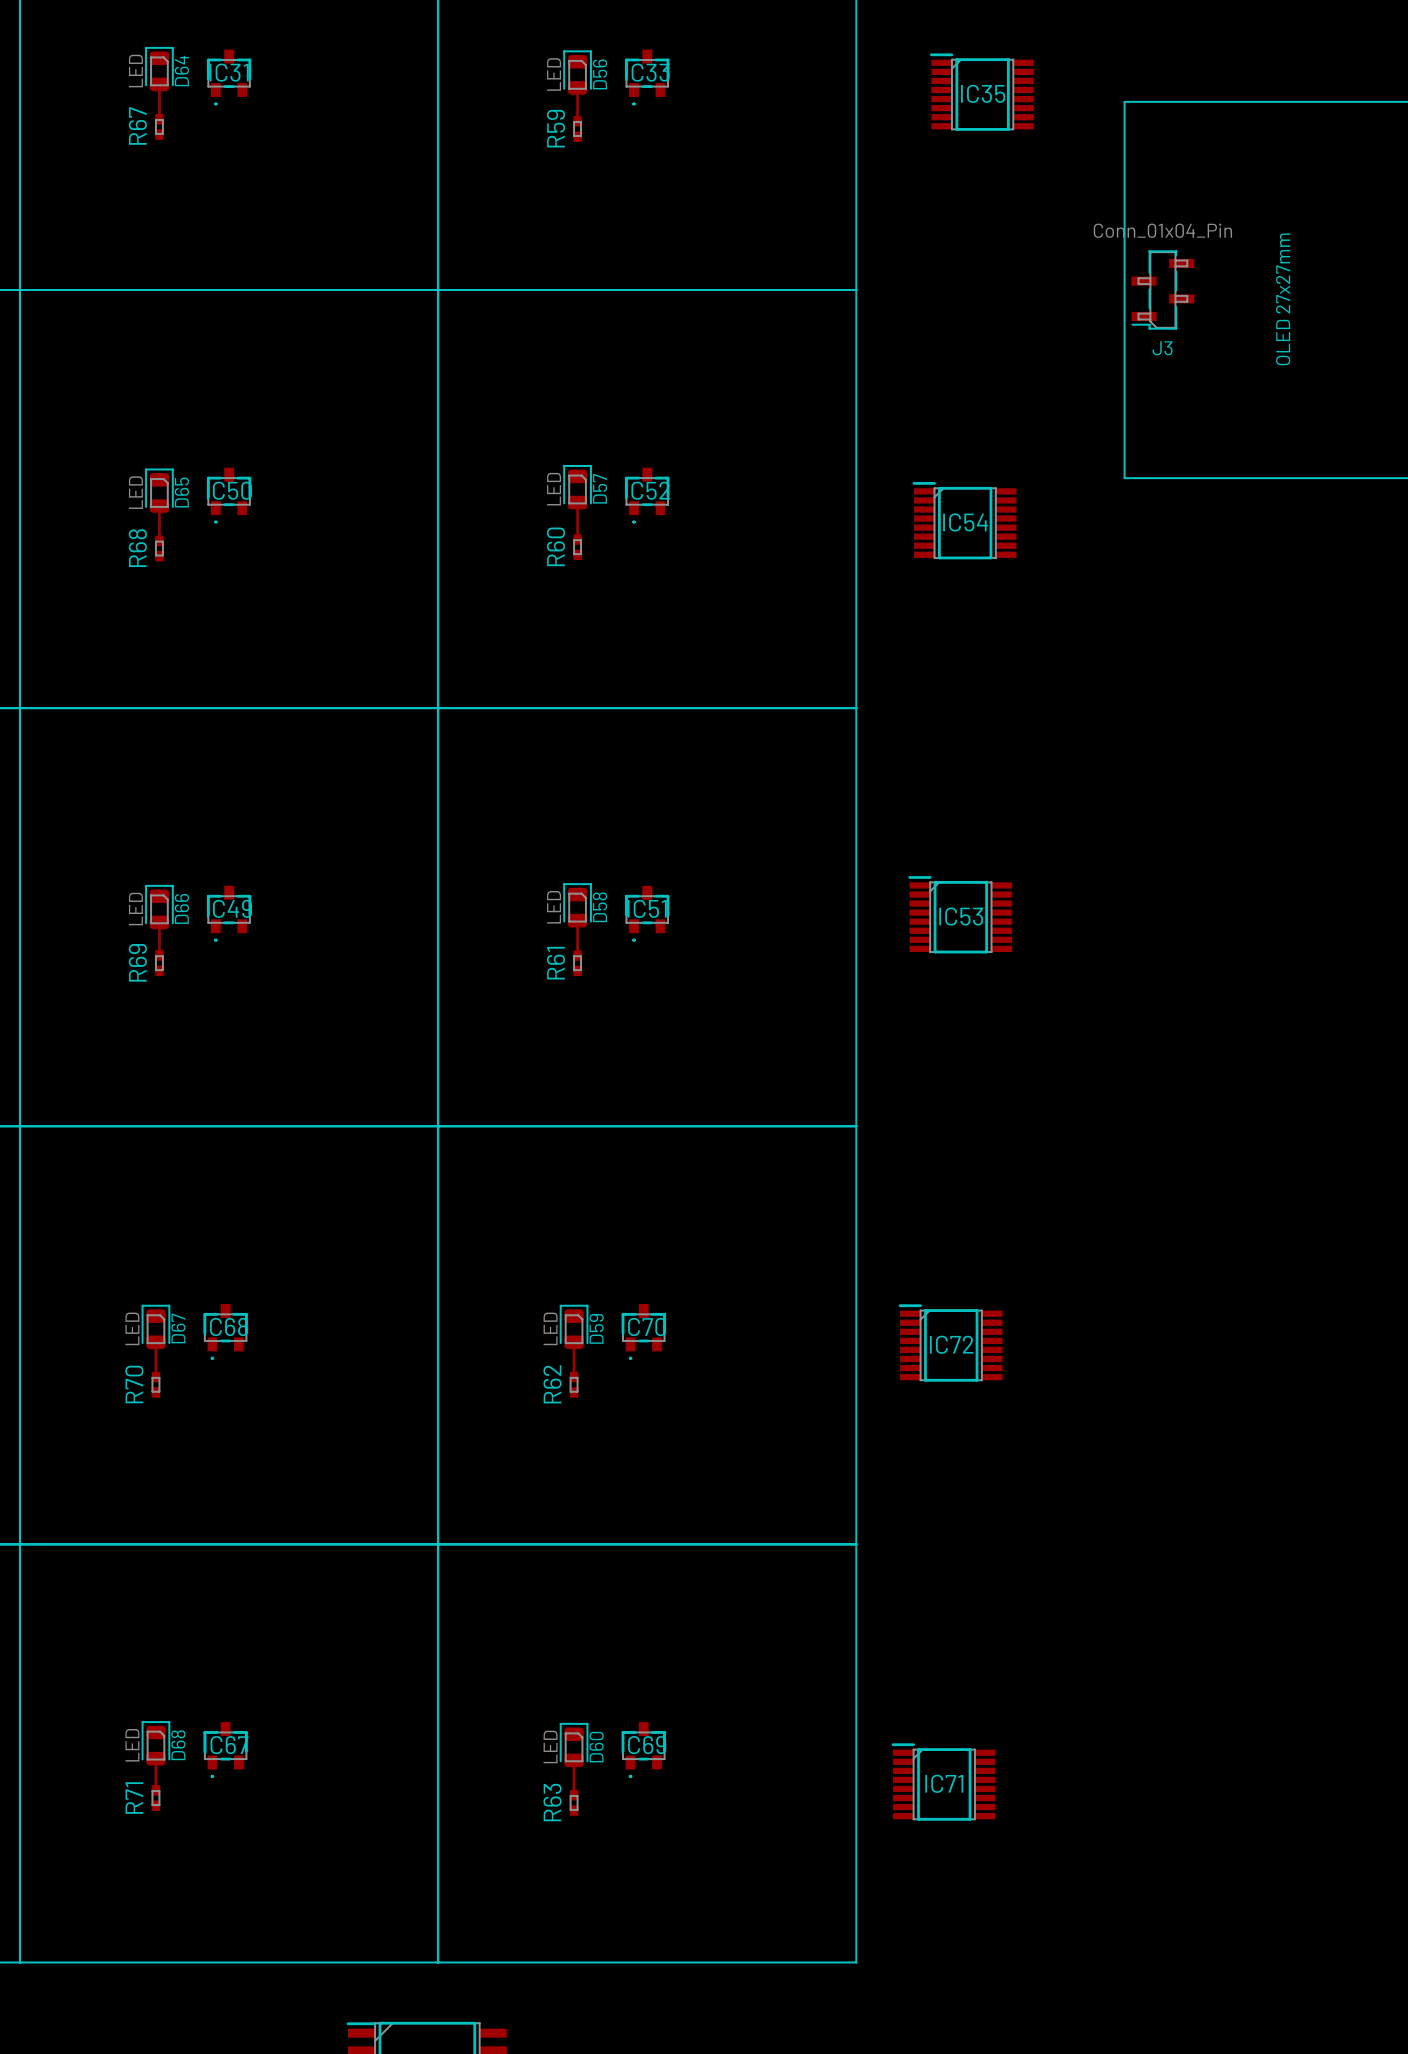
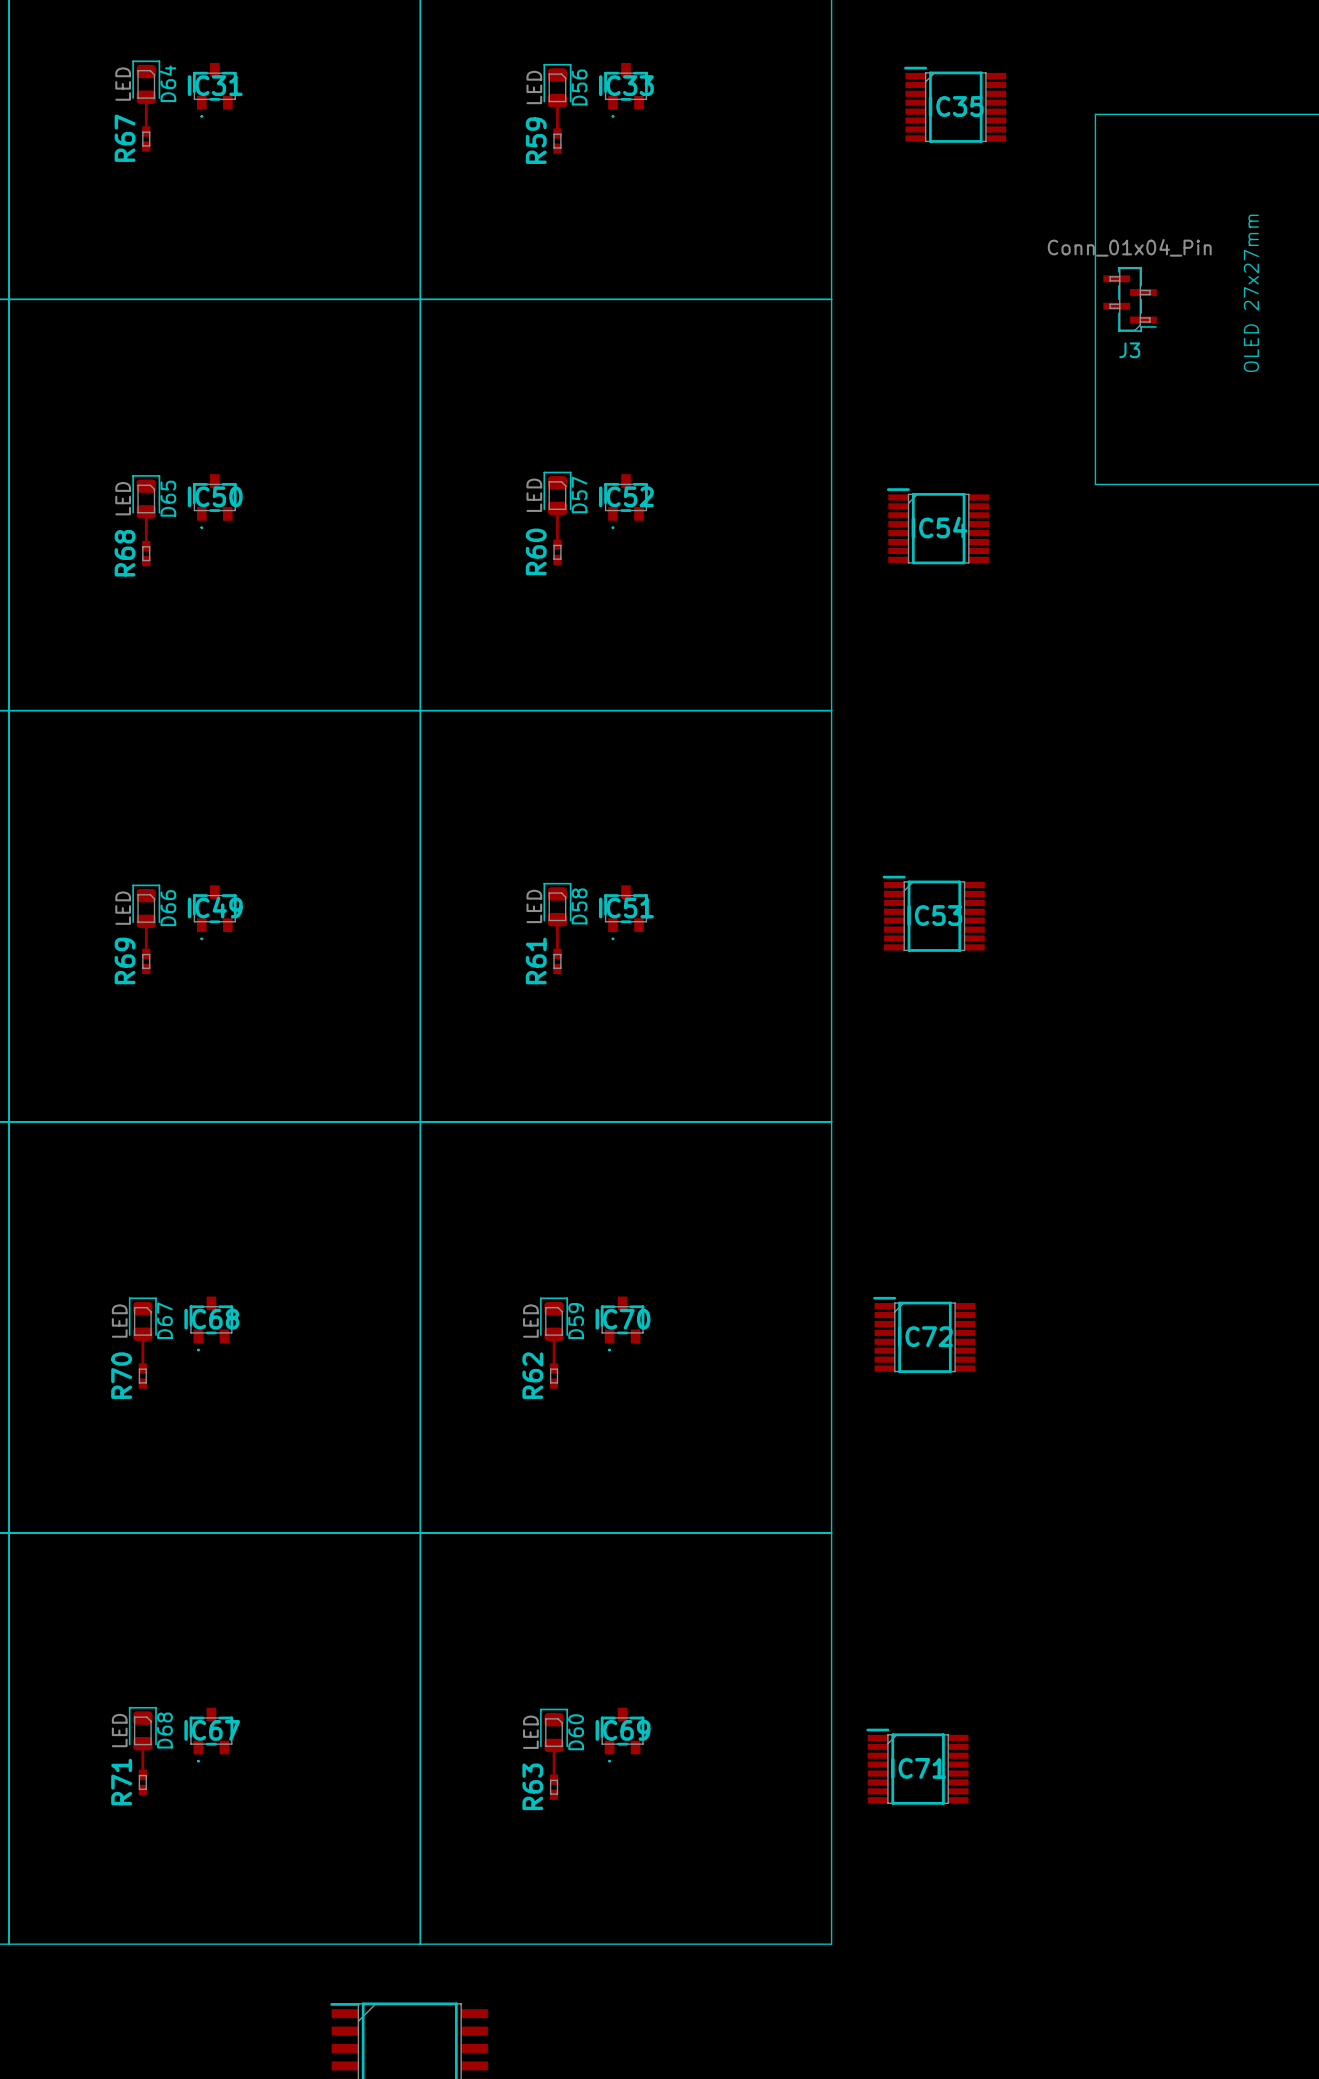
J3 footprint: [1131, 250, 1195, 330] -> [1103, 266, 1157, 332]

